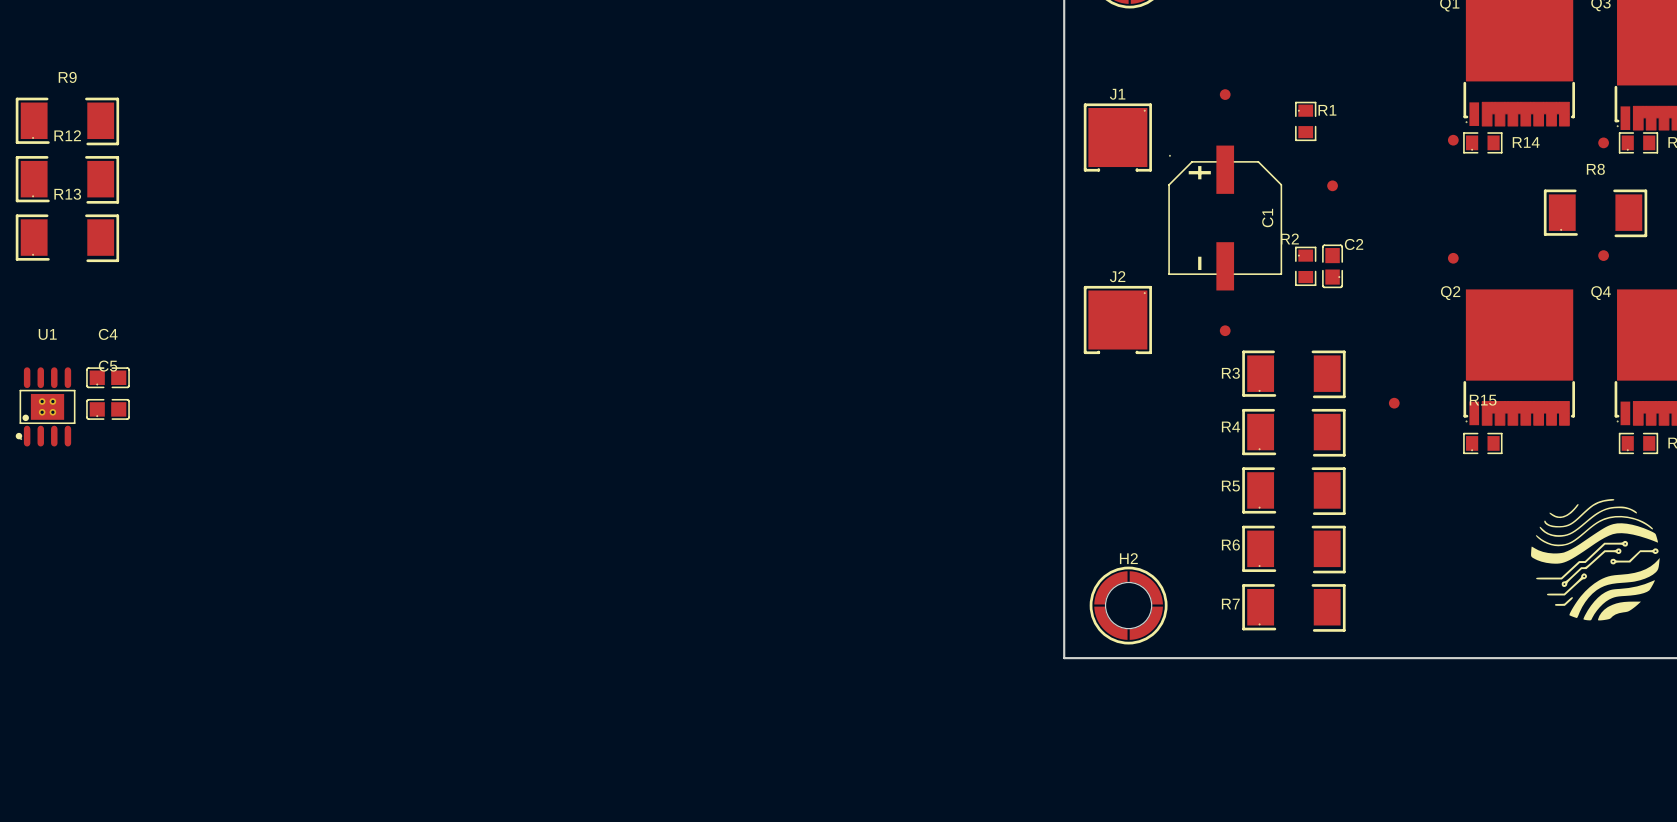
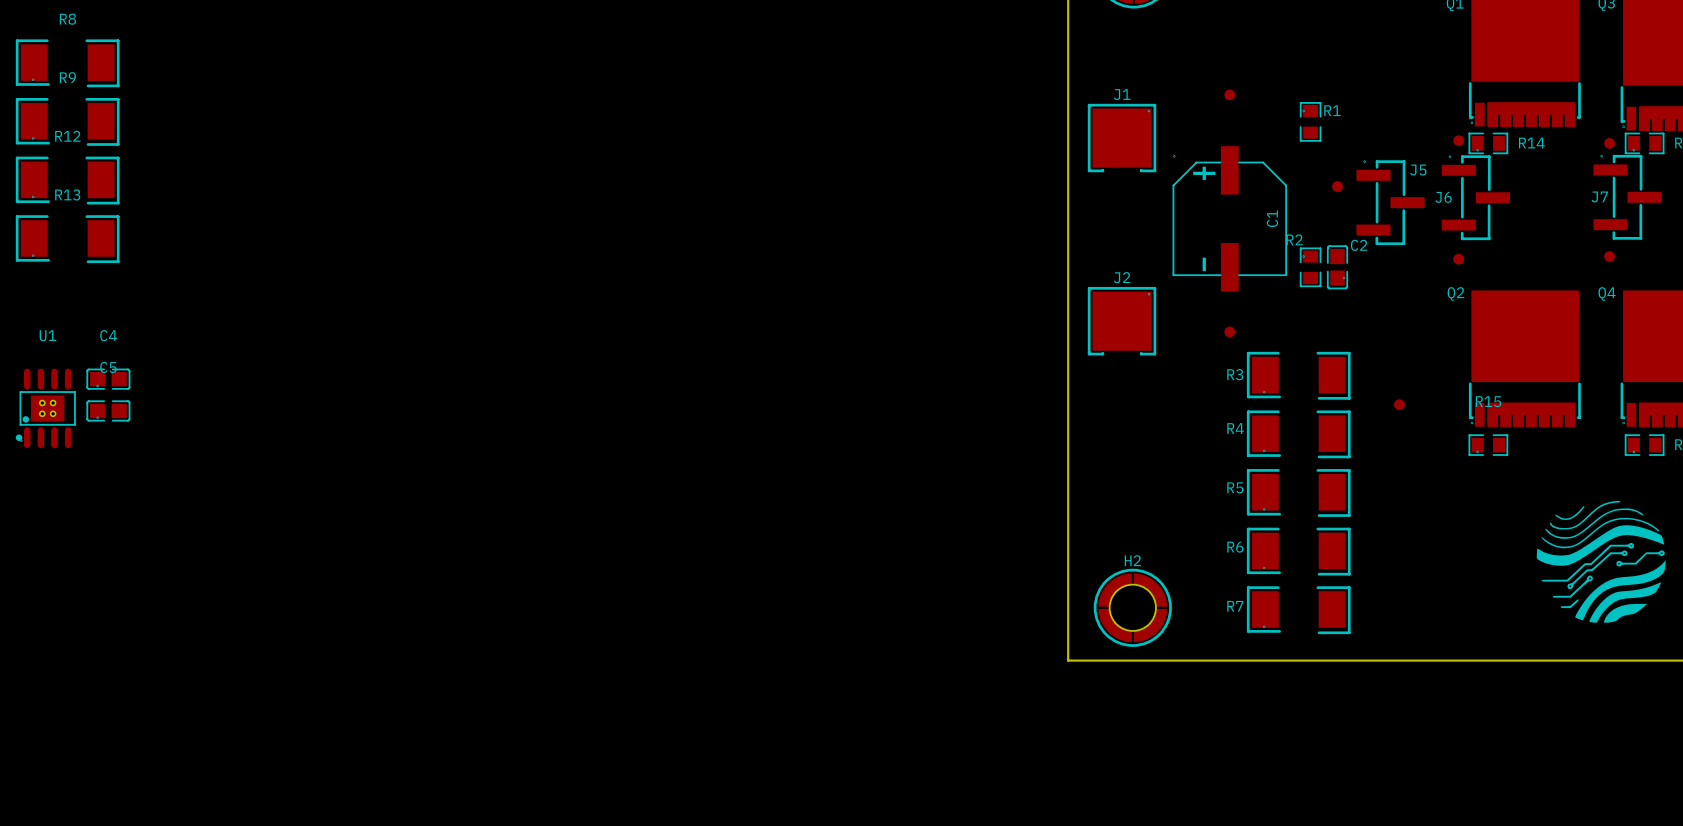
J6: none -> (1475, 197)
J7: none -> (1627, 197)
J5: none -> (1390, 202)
R8 position: (1595, 213) -> (67, 63)

